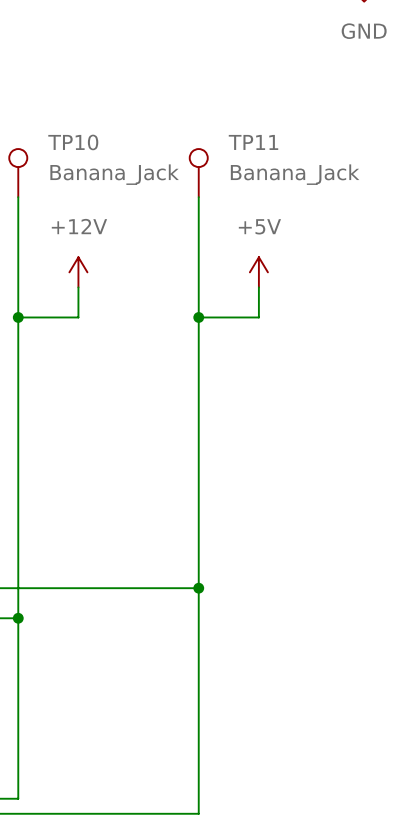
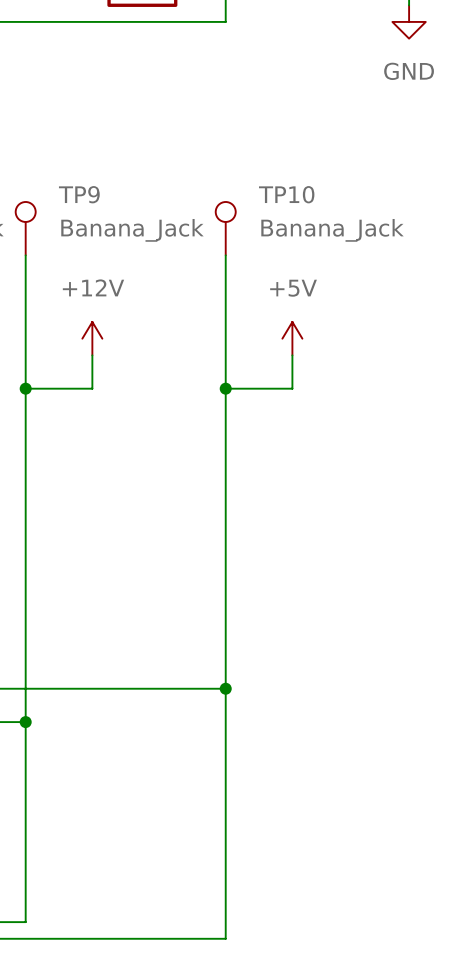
TP10 name: TP10 (73, 142) -> TP9 (79, 194)
TP11 name: TP11 (253, 142) -> TP10 (286, 194)

